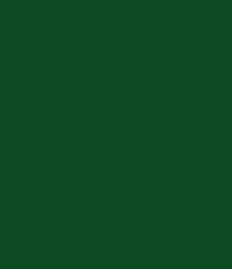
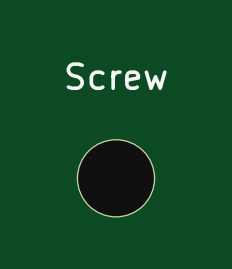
Screw: none -> (116, 178)

